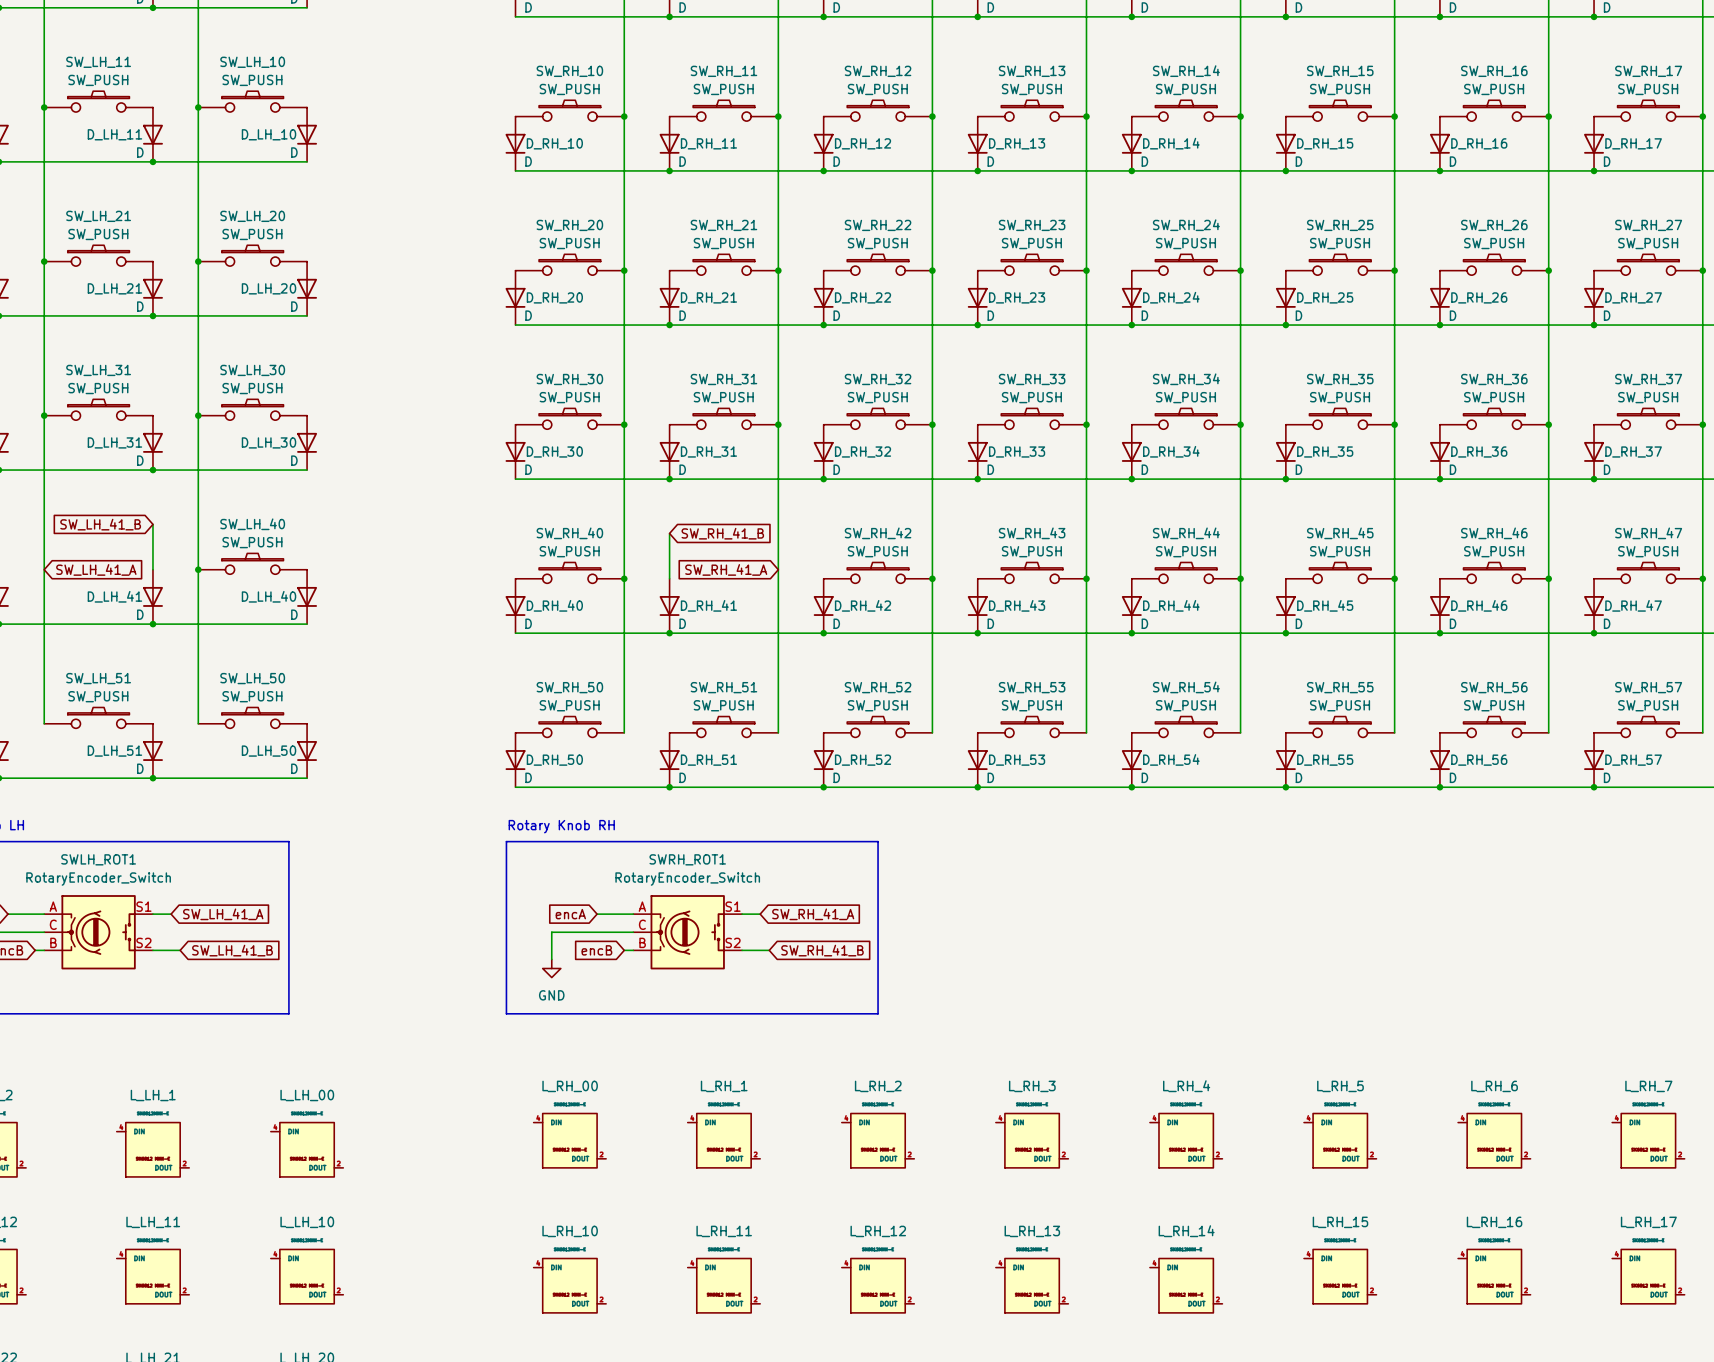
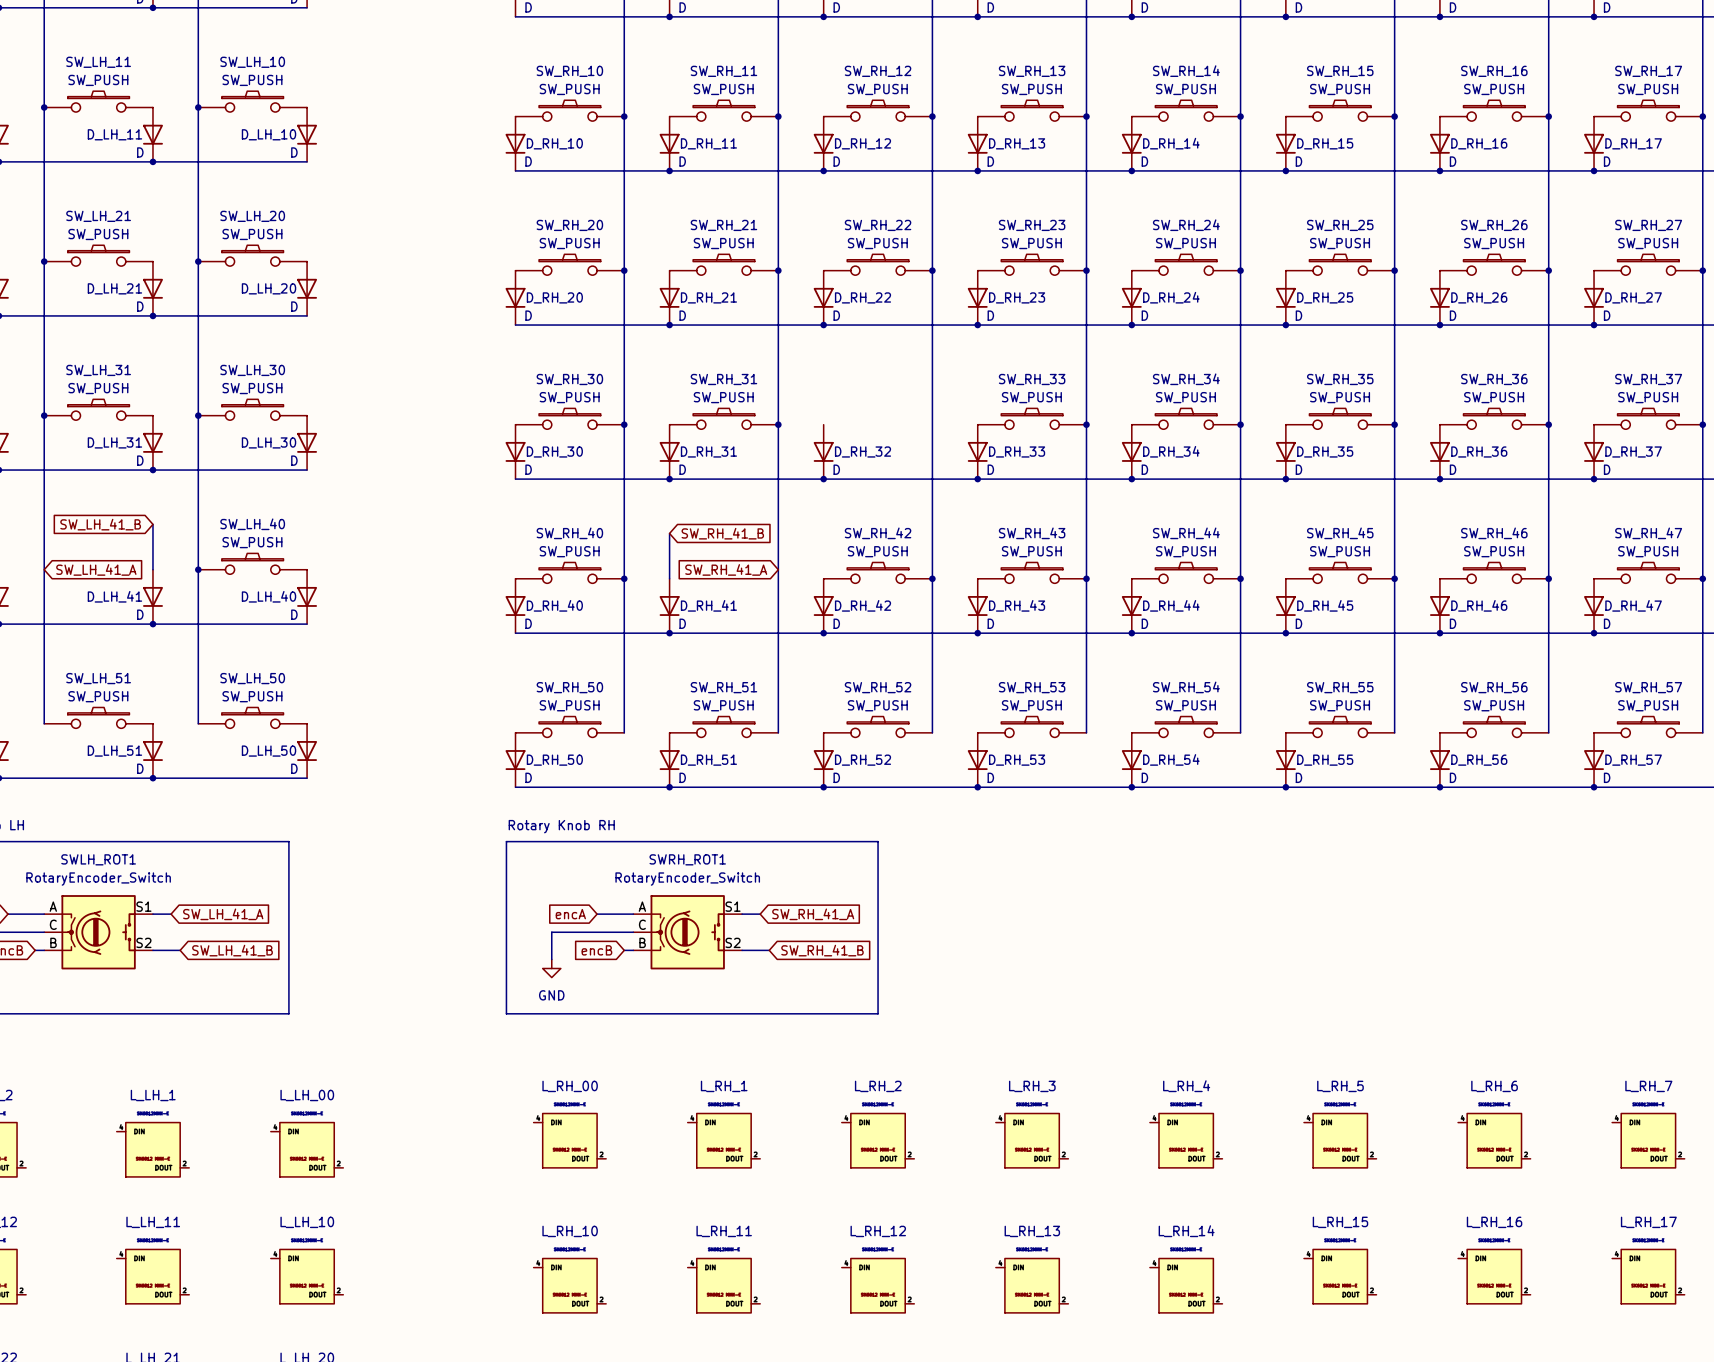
SW_RH_32: SW_PUSH (878, 418) -> none
junction: (932, 424) -> none

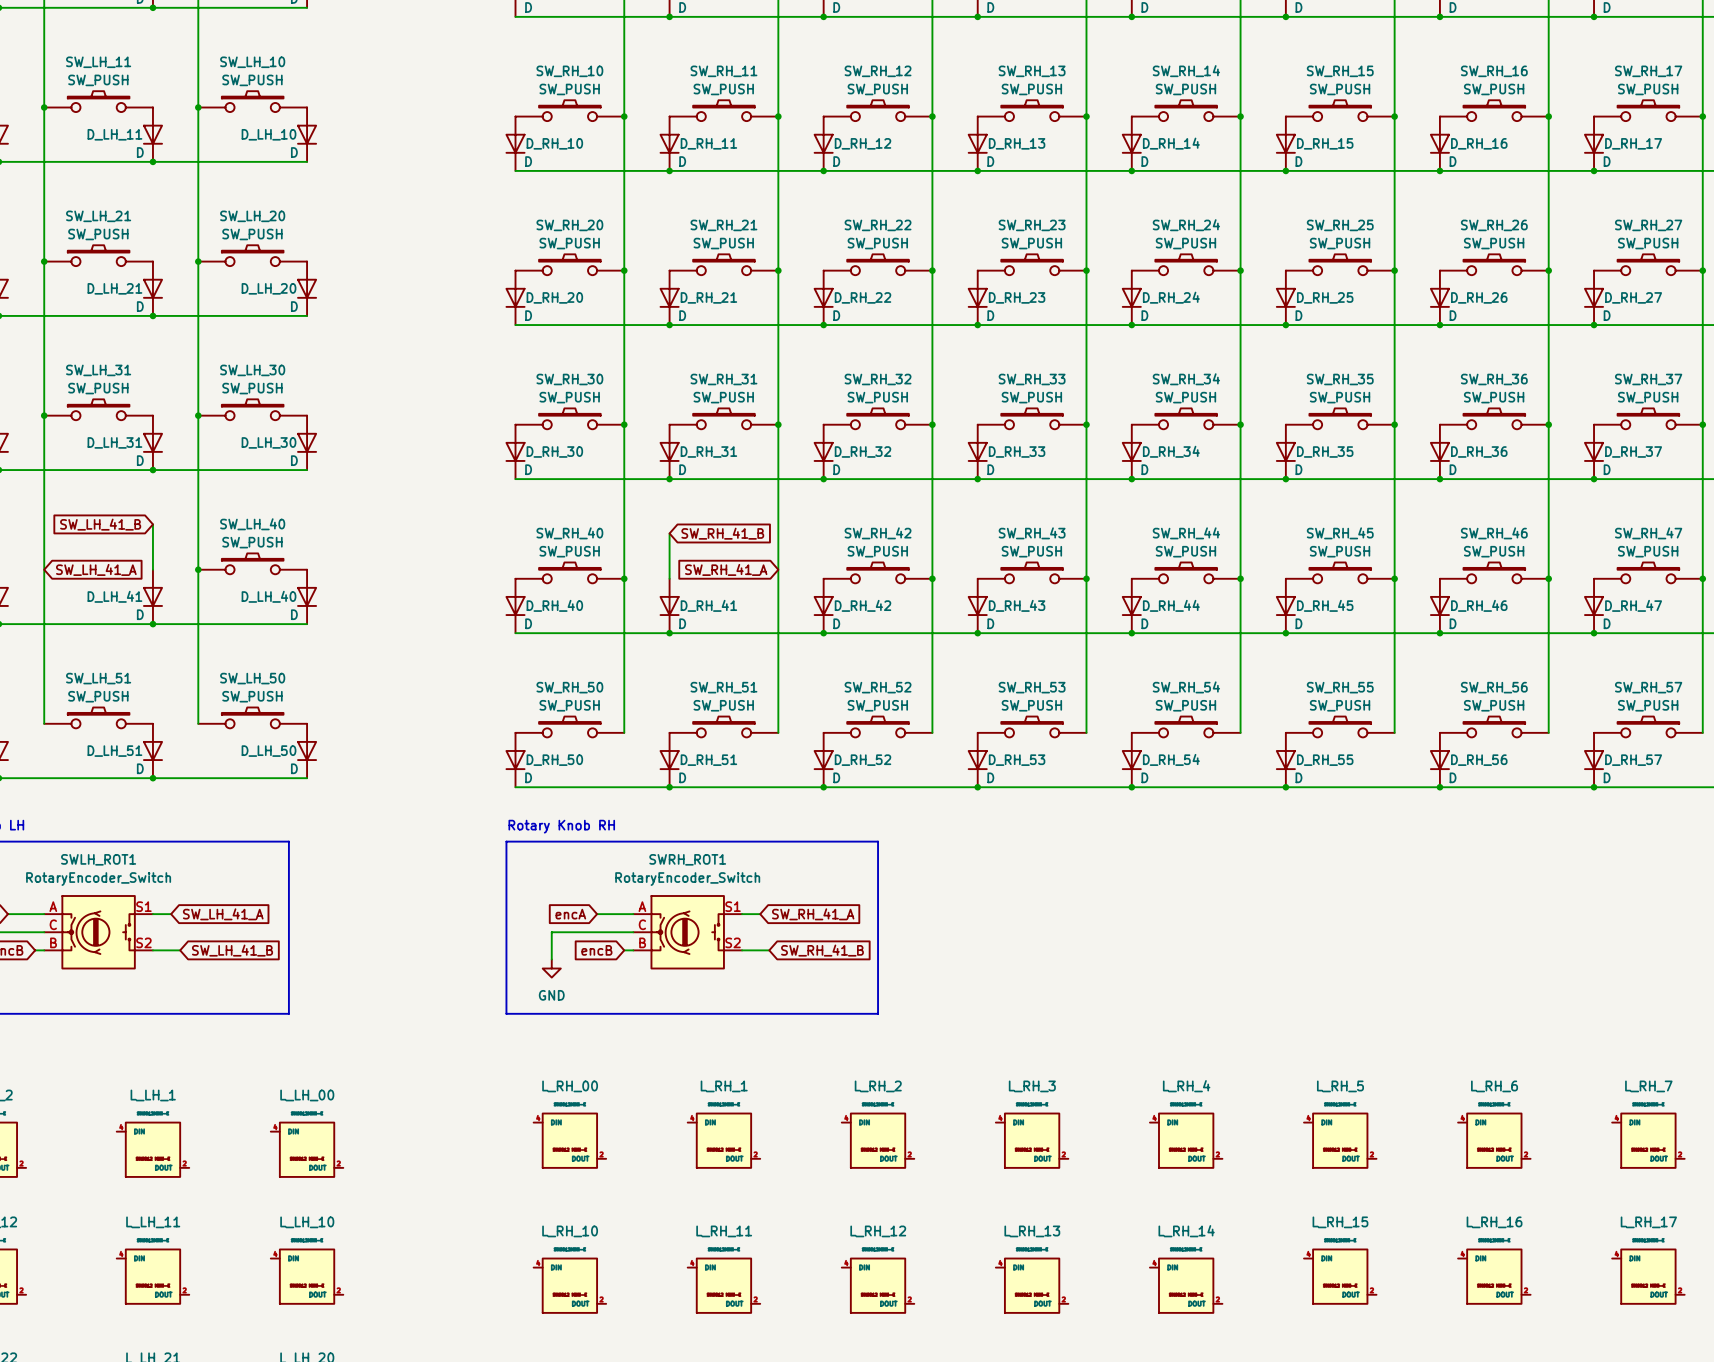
SW_RH_32: none -> SW_PUSH (878, 418)
junction: none -> (932, 424)

